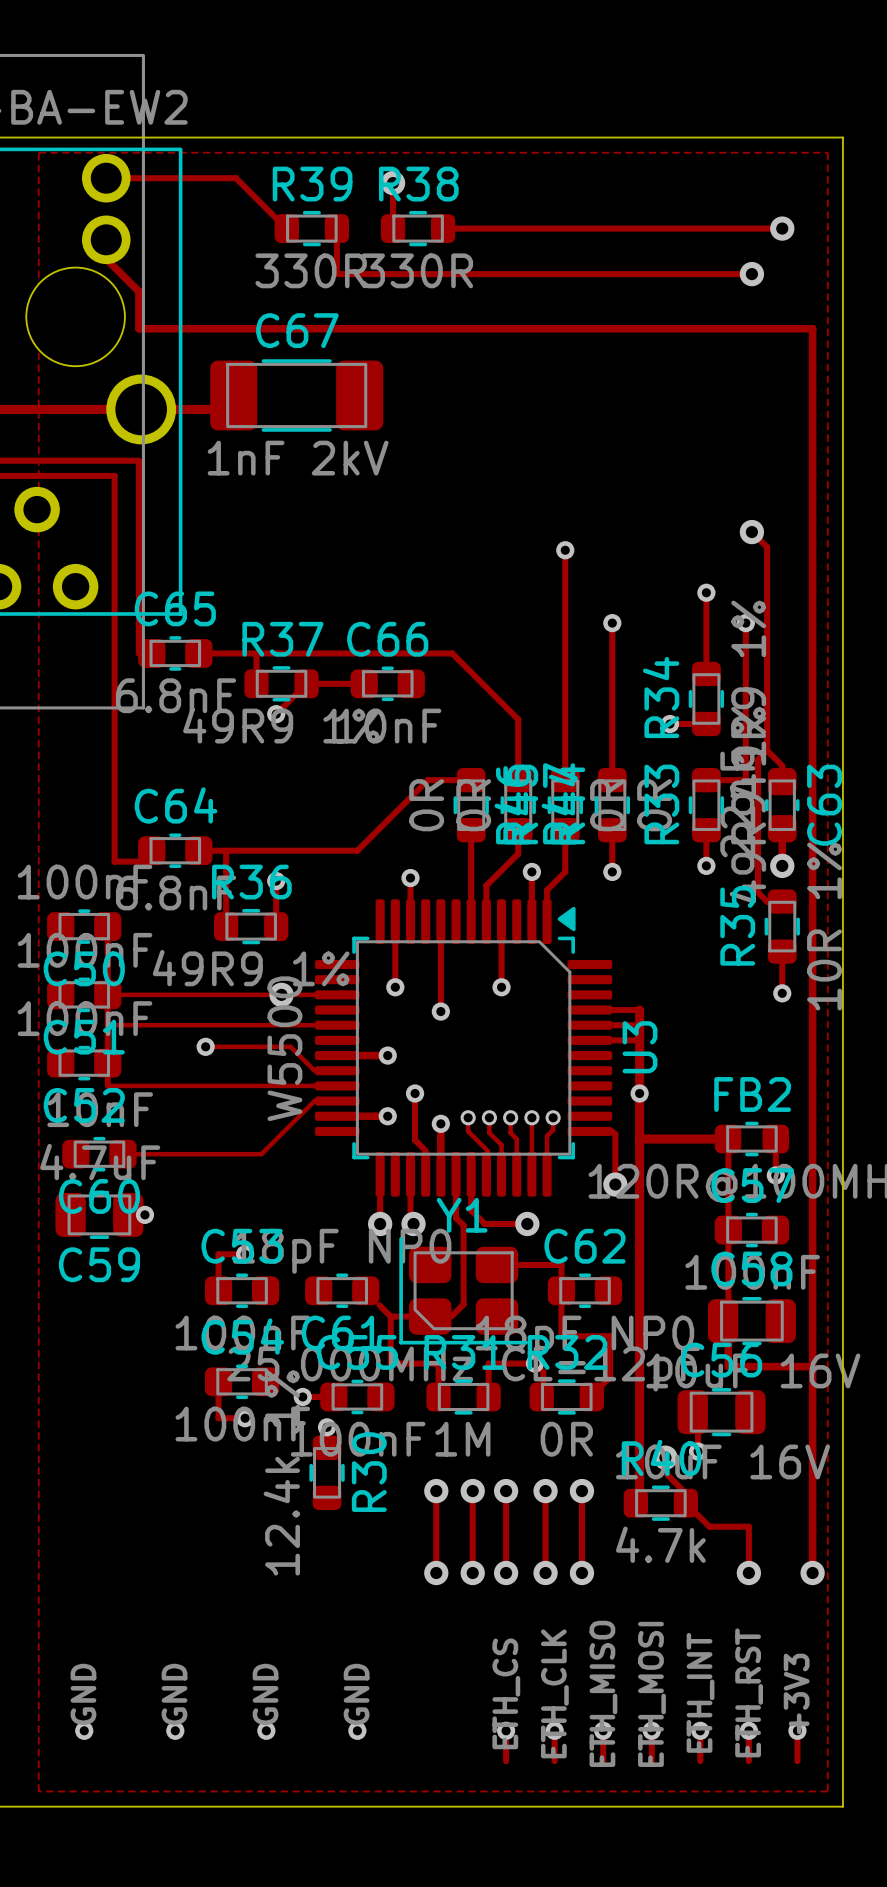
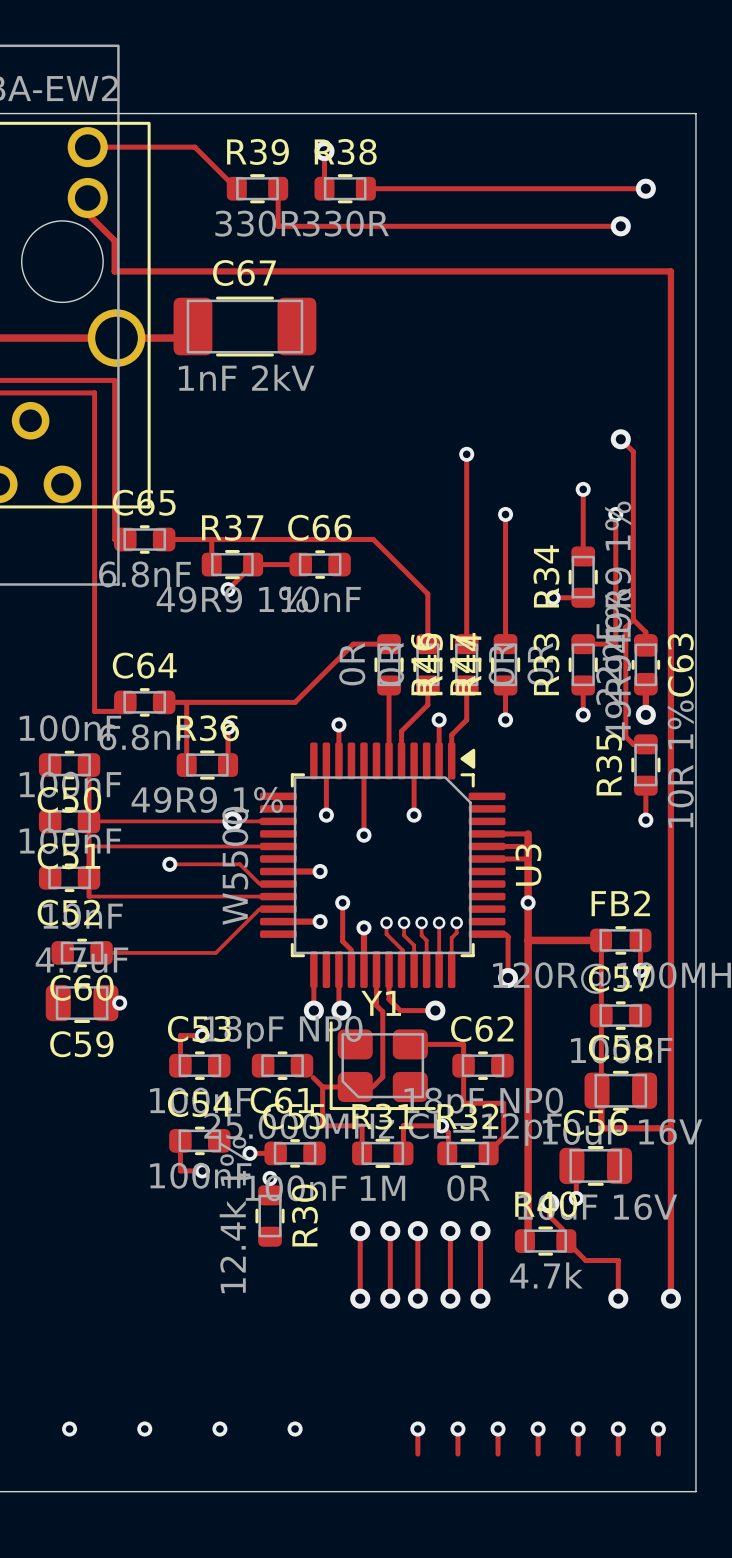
zone outline: (38, 152) (827, 152) (827, 1791) (38, 1791) (38, 152) -> none
text: ETH_INT (700, 1692) -> none
text: ETH_RST (749, 1692) -> none
text: ETH_CS (506, 1693) -> none
text: ETH_CLK (554, 1693) -> none
text: ETH_MISO (603, 1693) -> none
text: +3V3 (796, 1693) -> none
text: GND (83, 1694) -> none
text: GND (174, 1694) -> none
text: GND (265, 1694) -> none
text: GND (356, 1694) -> none
text: ETH_MOSI (651, 1694) -> none

